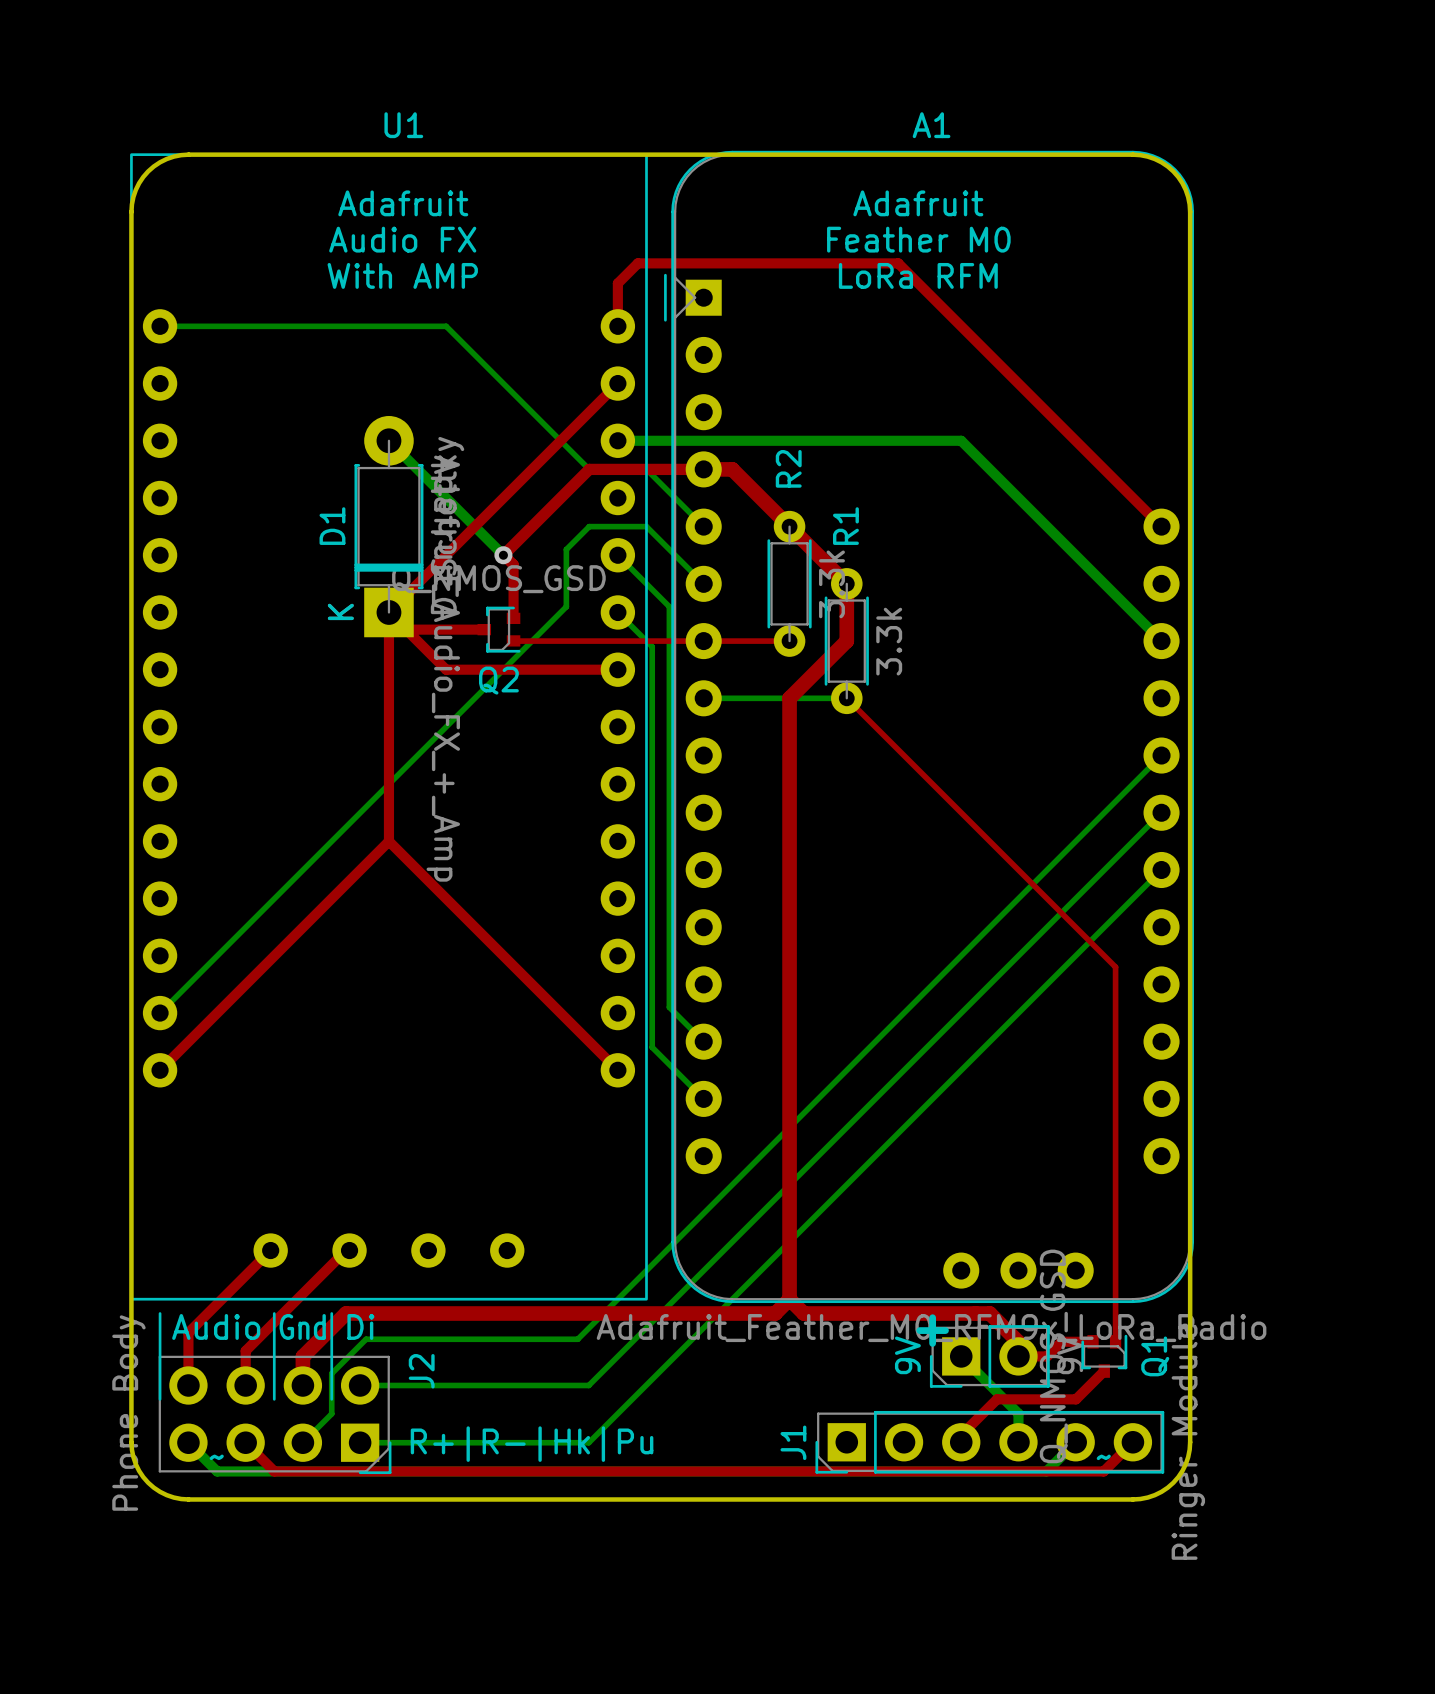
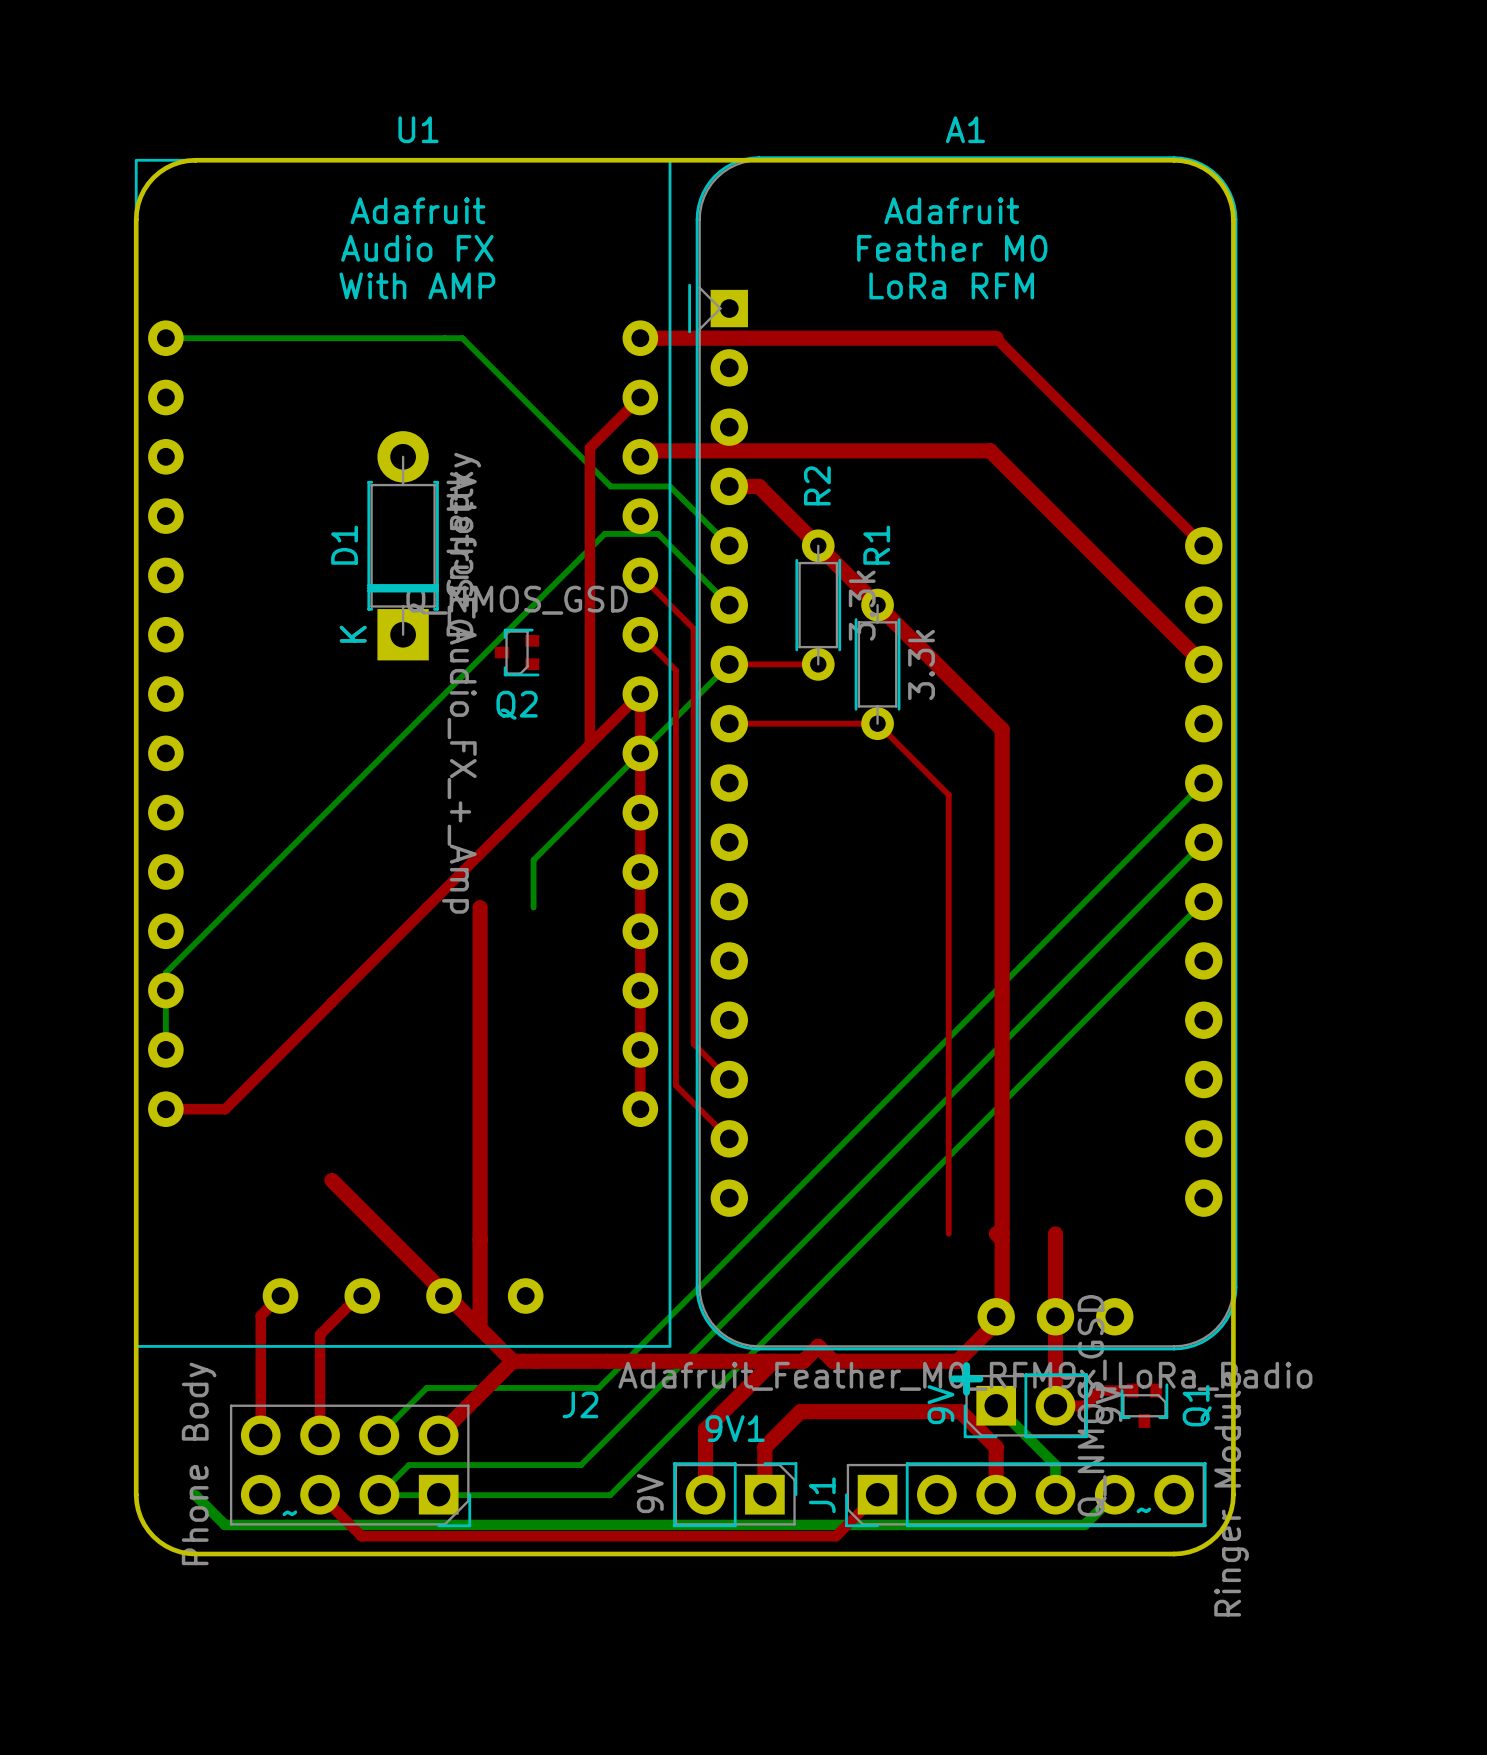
top track: (617, 326) (617, 283) (637, 263) (898, 263) (961, 326) -> (640, 338) (996, 338)
top track: (569, 432) (388, 612) -> (589, 447) (589, 744)
bottom track: (388, 440) (503, 555) -> none
top track: none -> (640, 456) (646, 450) (990, 450) (1203, 664)
bottom track: (617, 440) (961, 440) (1161, 641) -> none
top track: (703, 469) (589, 469) (503, 554) (513, 564) -> none
bottom track: (646, 526) (589, 526) (566, 549) (566, 606) (160, 1013) -> (669, 545) (658, 533) (604, 533) (165, 972) (165, 1049)
via: (503, 555) -> none
top track: none -> (640, 575) (693, 628) (693, 1043) (729, 1079)
bottom track: (617, 555) (669, 606) (669, 1007) (703, 1041) -> none
top track: (513, 564) (513, 618) -> none
top track: (846, 583) (846, 641) (789, 698) (789, 1299) -> (877, 605) (1002, 729) (1002, 1233)
top track: (388, 612) (446, 669) (617, 669) -> none
top track: (388, 612) (388, 841) -> none
top track: none -> (640, 634) (675, 670) (675, 1085) (729, 1138)
bottom track: (617, 612) (652, 646) (652, 1047) (703, 1098) -> none
top track: (406, 629) (484, 629) -> none
top track: (510, 640) (703, 641) -> none
bottom track: none -> (729, 664) (533, 860) (533, 907)
top track: none -> (729, 723) (877, 723)
bottom track: (703, 698) (846, 698) -> none
top track: (915, 766) (1115, 967) (1115, 1341) -> (948, 794) (948, 1233)
top track: none -> (499, 835) (331, 1002)
top track: (388, 841) (617, 1070) -> (499, 835) (640, 694) (640, 1109)
top track: (388, 841) (160, 1070) -> (331, 1002) (225, 1109) (165, 1109)
top track: none -> (480, 907) (480, 1322) (477, 1325)
top track: none -> (331, 1180) (512, 1361) (438, 1435)
top track: none -> (996, 1233) (1002, 1239) (1002, 1316) (957, 1361)
top track: (251, 1269) (188, 1332) (188, 1385) -> (260, 1315) (260, 1435)
top track: (308, 1287) (245, 1350) (245, 1385) -> (320, 1334) (320, 1435)
line: (160, 1313) (160, 1399) -> none
line: (274, 1313) (274, 1399) -> none
line: (331, 1313) (331, 1399) -> none
top track: (494, 1313) (346, 1313) (302, 1356) (302, 1385) -> none
top track: none -> (773, 1361) (705, 1429) (705, 1494)
top track: (924, 1313) (989, 1313) (1018, 1342) -> (1055, 1233) (1055, 1390)
text: Audio (216, 1326) -> none
text: Gnd (302, 1326) -> none
text: Di (360, 1326) -> none
bottom track: (411, 1339) (366, 1339) (331, 1373) (331, 1413) (302, 1442) -> (426, 1387) (379, 1435)
J2 name rotation: 0° (421, 1371) -> 90° clockwise (580, 1404)
J2 name position: J2 (421, 1371) -> J2 (580, 1404)
top track: (1104, 1371) (1076, 1399) (997, 1399) (961, 1435) -> (764, 1494) (764, 1447) (800, 1411) (960, 1411) (996, 1447) (996, 1487)
bottom track: (360, 1385) (588, 1385) -> (379, 1494) (409, 1465) (581, 1465) (610, 1435)
J2 position: (275, 1414) -> (350, 1465)
top track: none -> (320, 1494) (361, 1536) (836, 1536) (877, 1494)
9V1: none -> 9V (735, 1494)
top track: (1132, 1442) (1103, 1471) (274, 1471) (245, 1442) -> none
text: R+|R-|Hk|Pu (532, 1444) -> none
text position: ~ (216, 1457) -> ~ (289, 1513)

